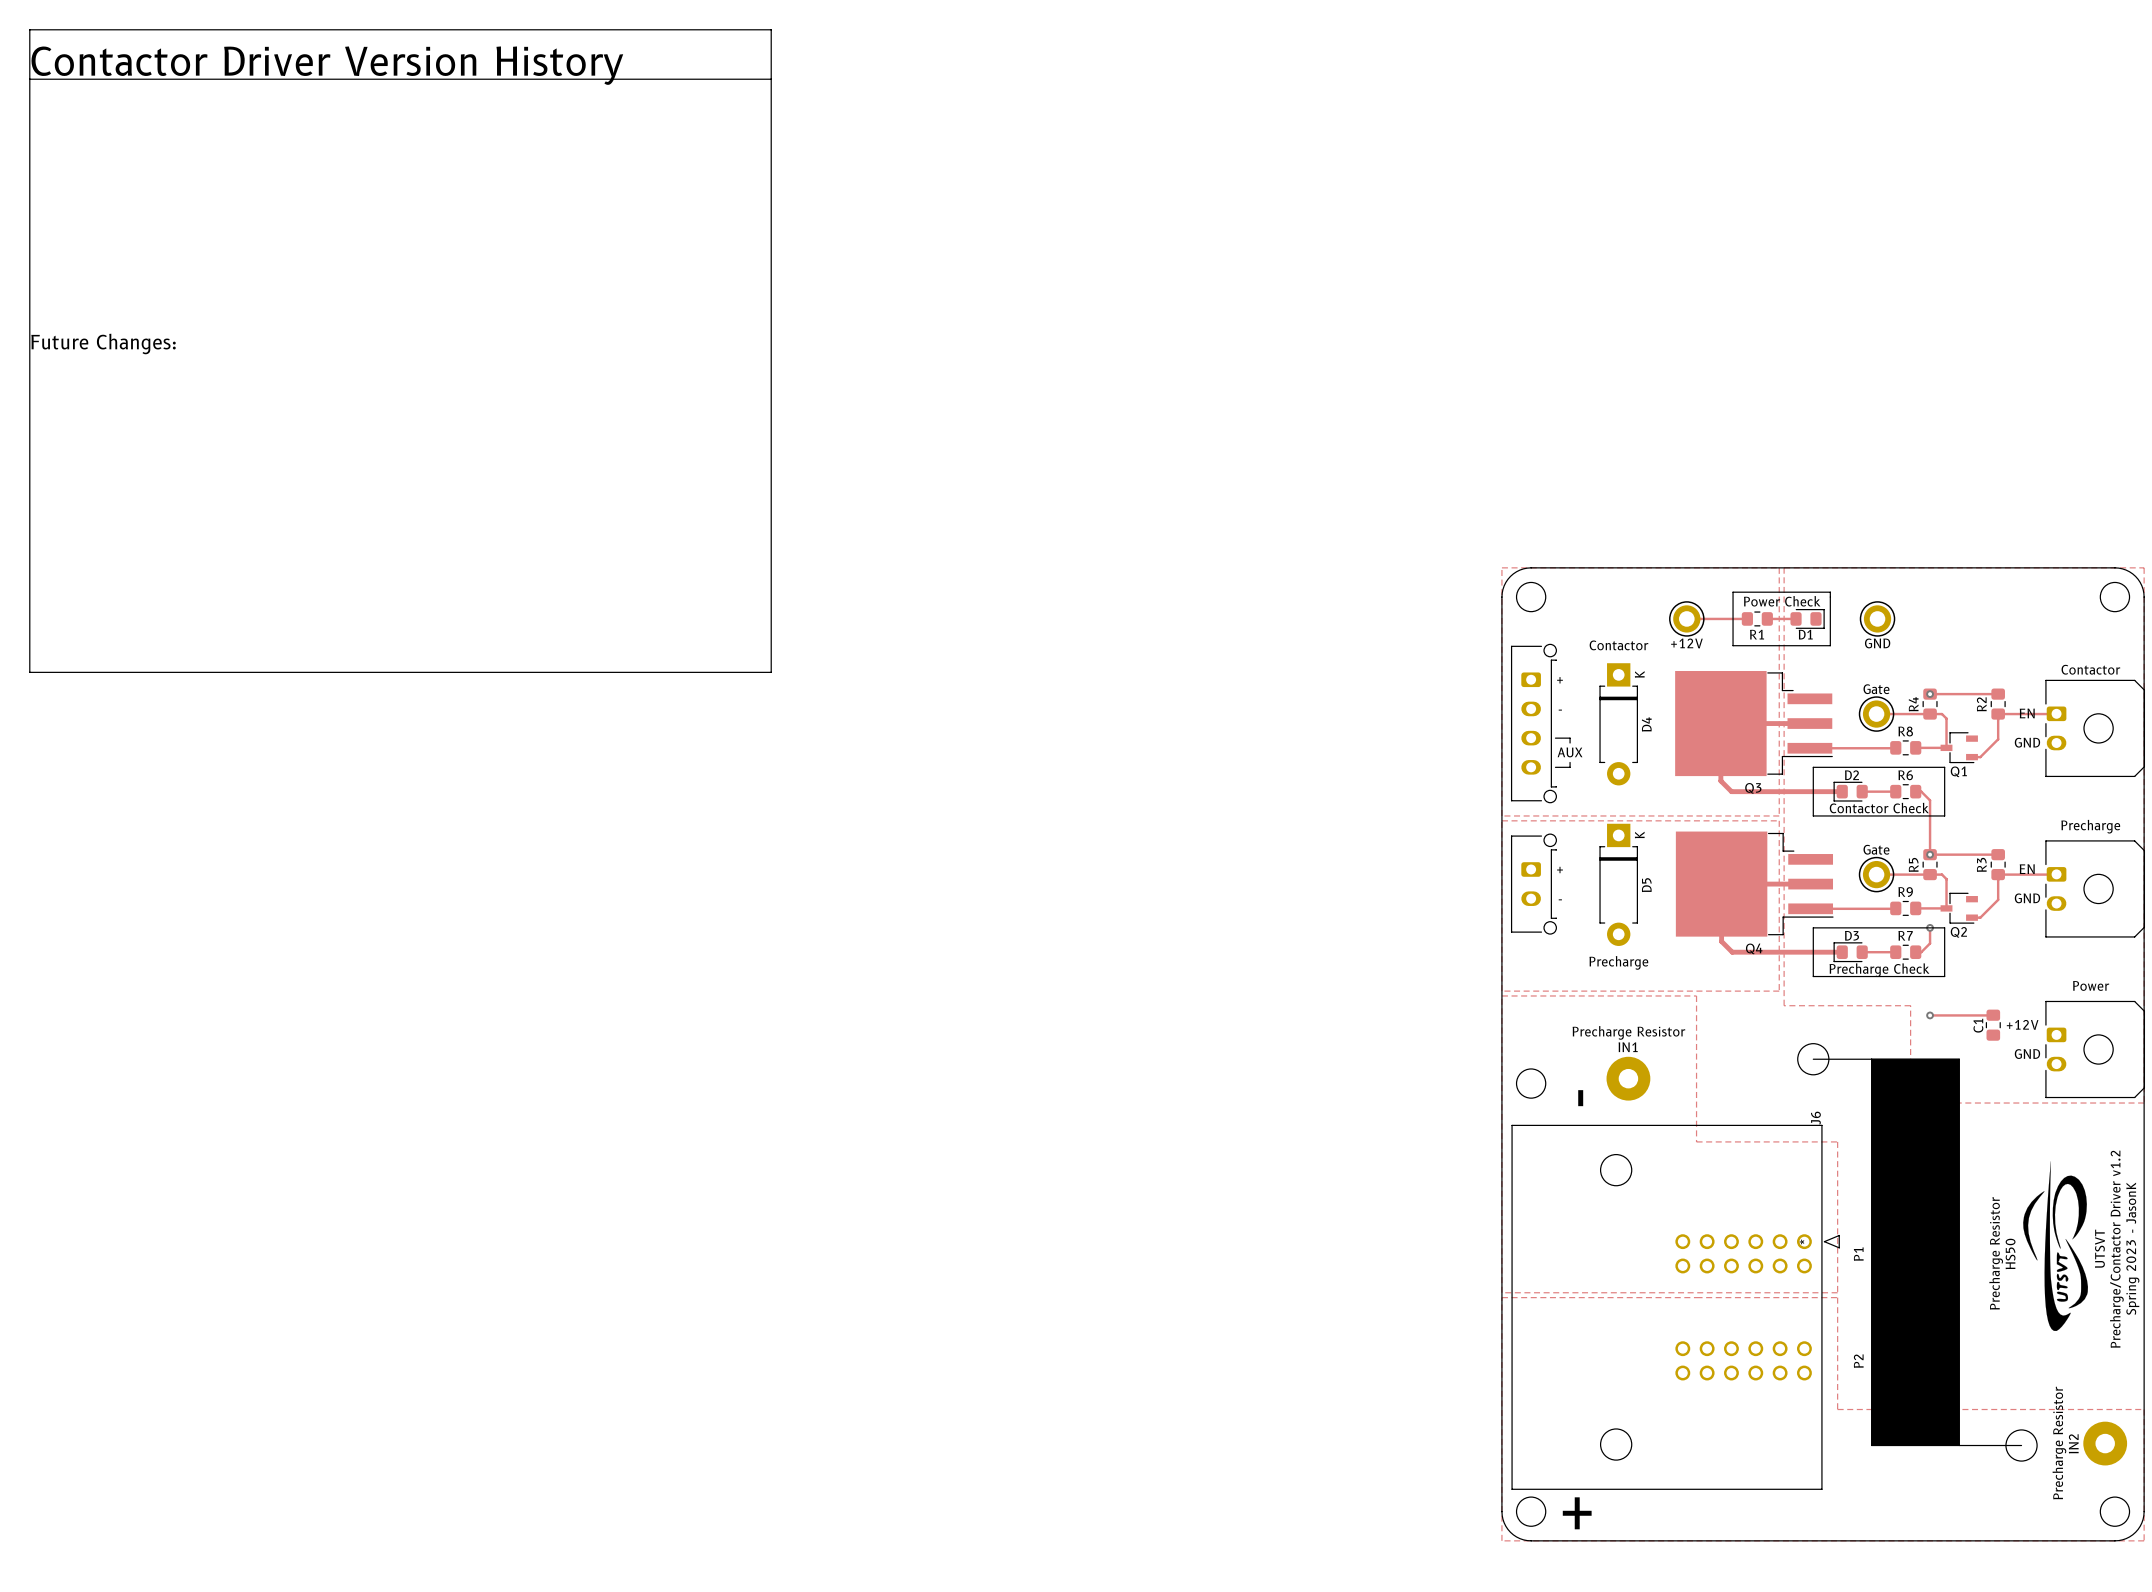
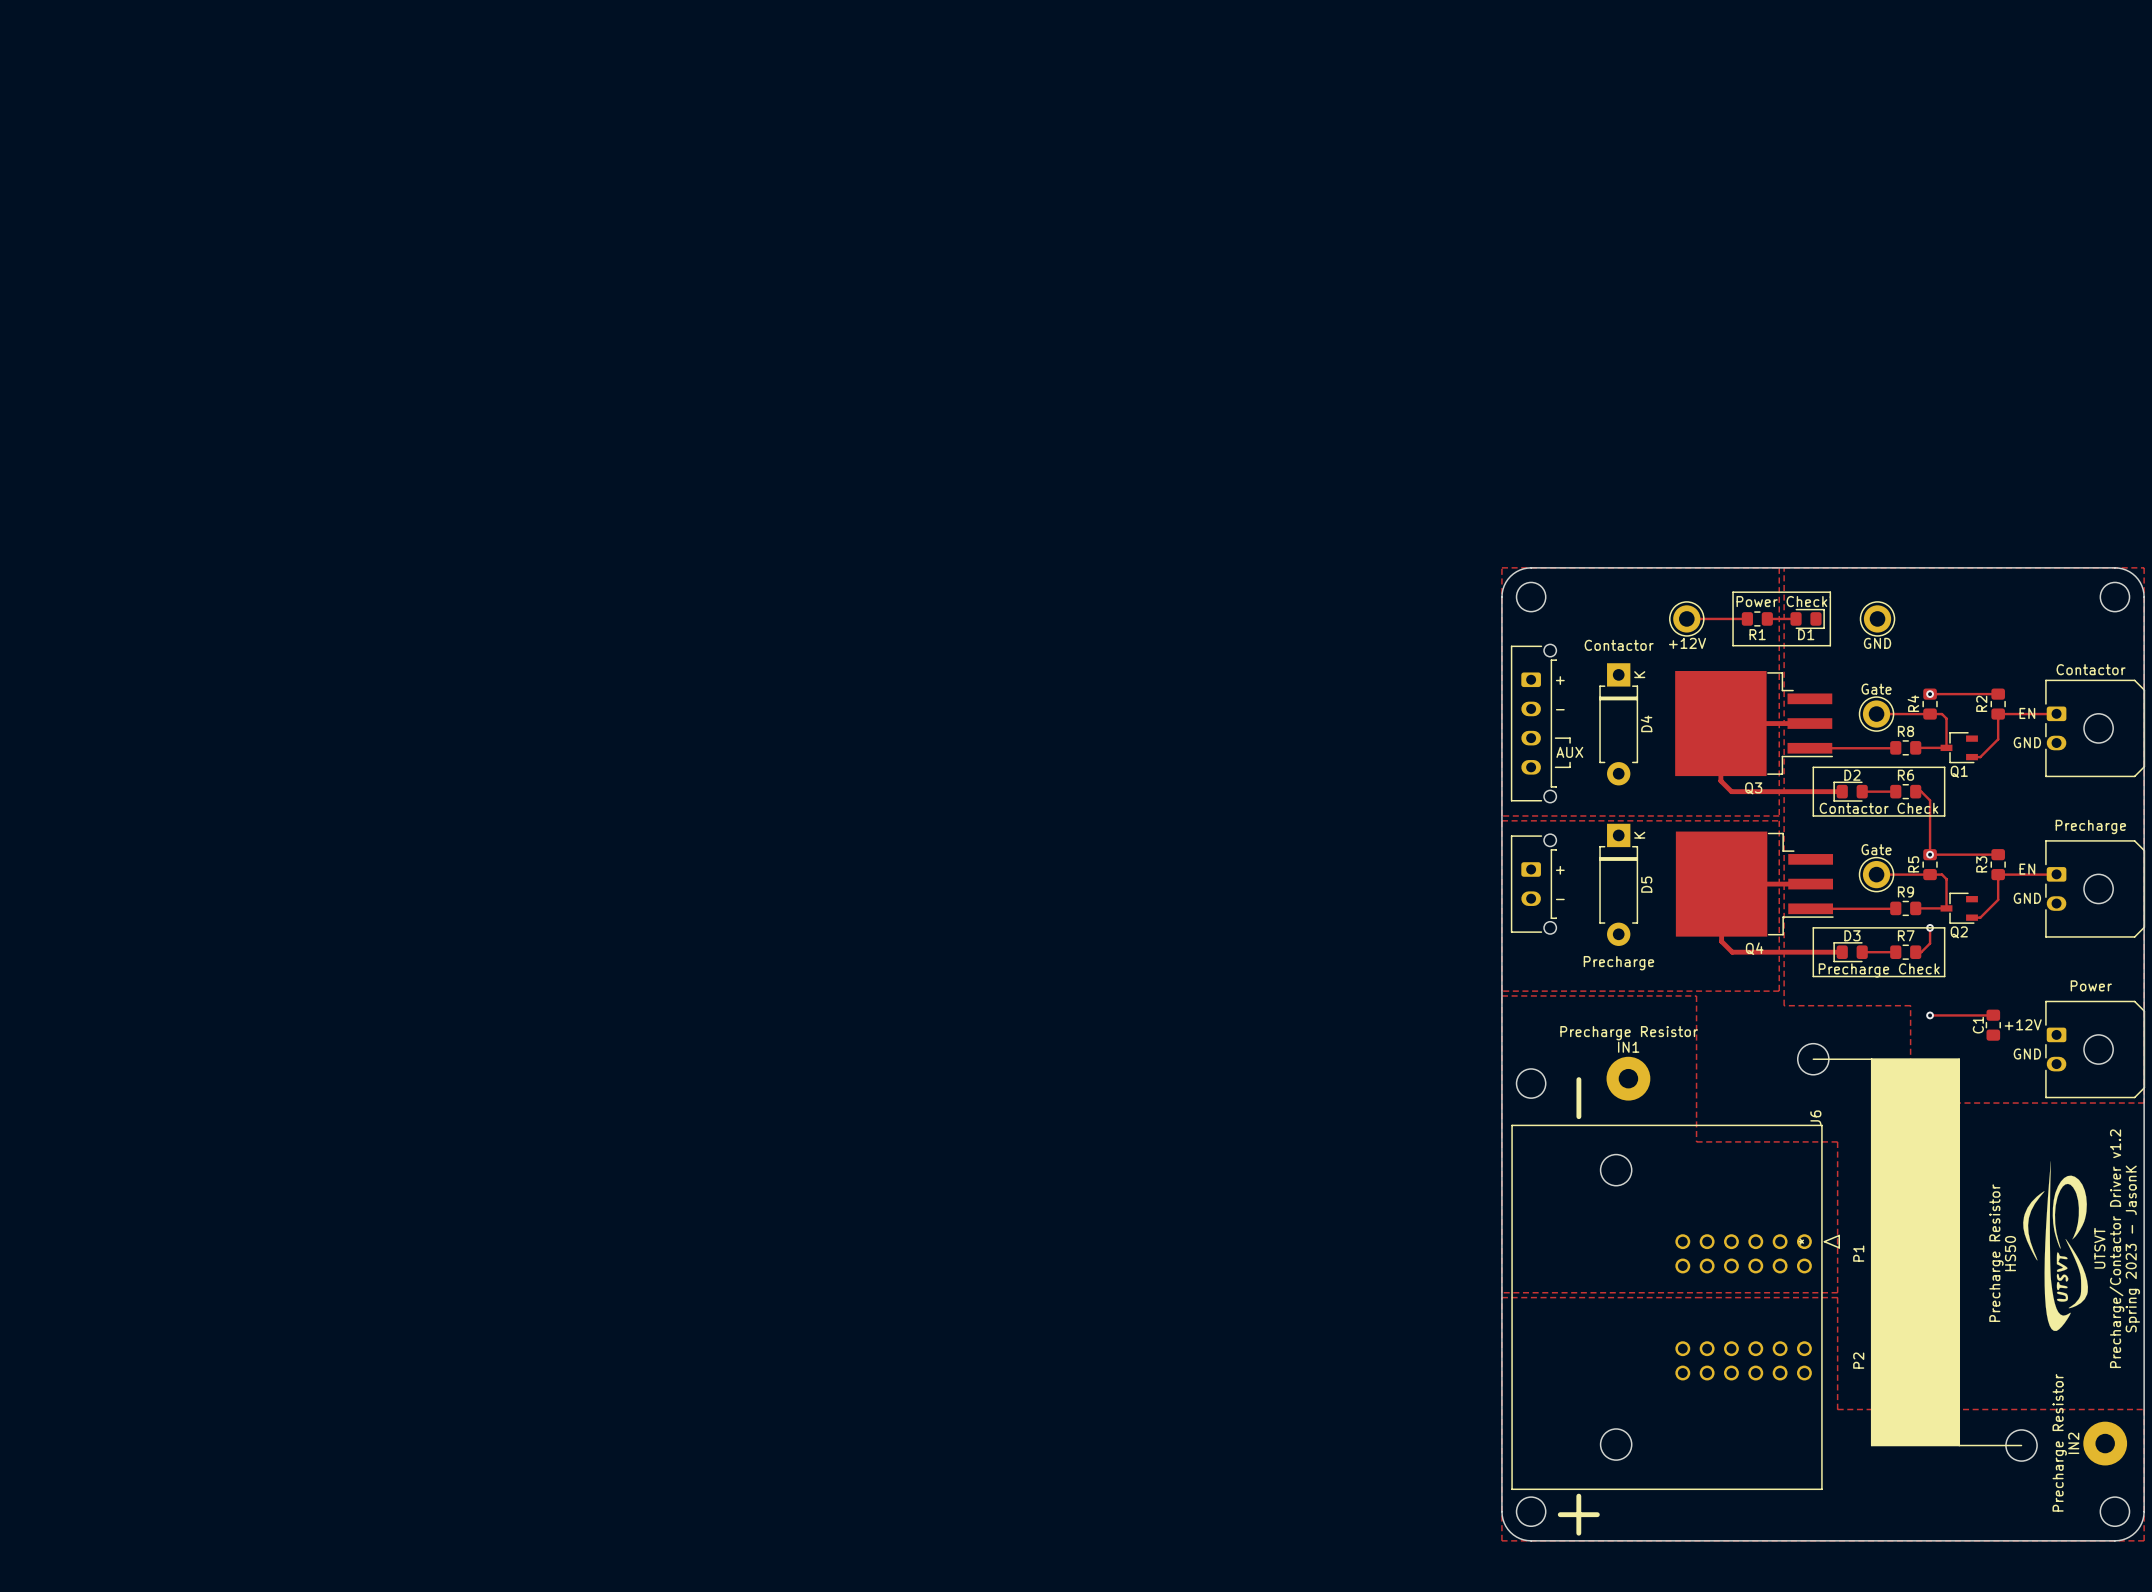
line: (29, 29) (771, 29) (771, 672) (29, 672) (29, 29) -> none
text: Contactor Driver Version History (327, 65) -> none
line: (29, 79) (771, 79) -> none
text: Future Changes: (103, 343) -> none

